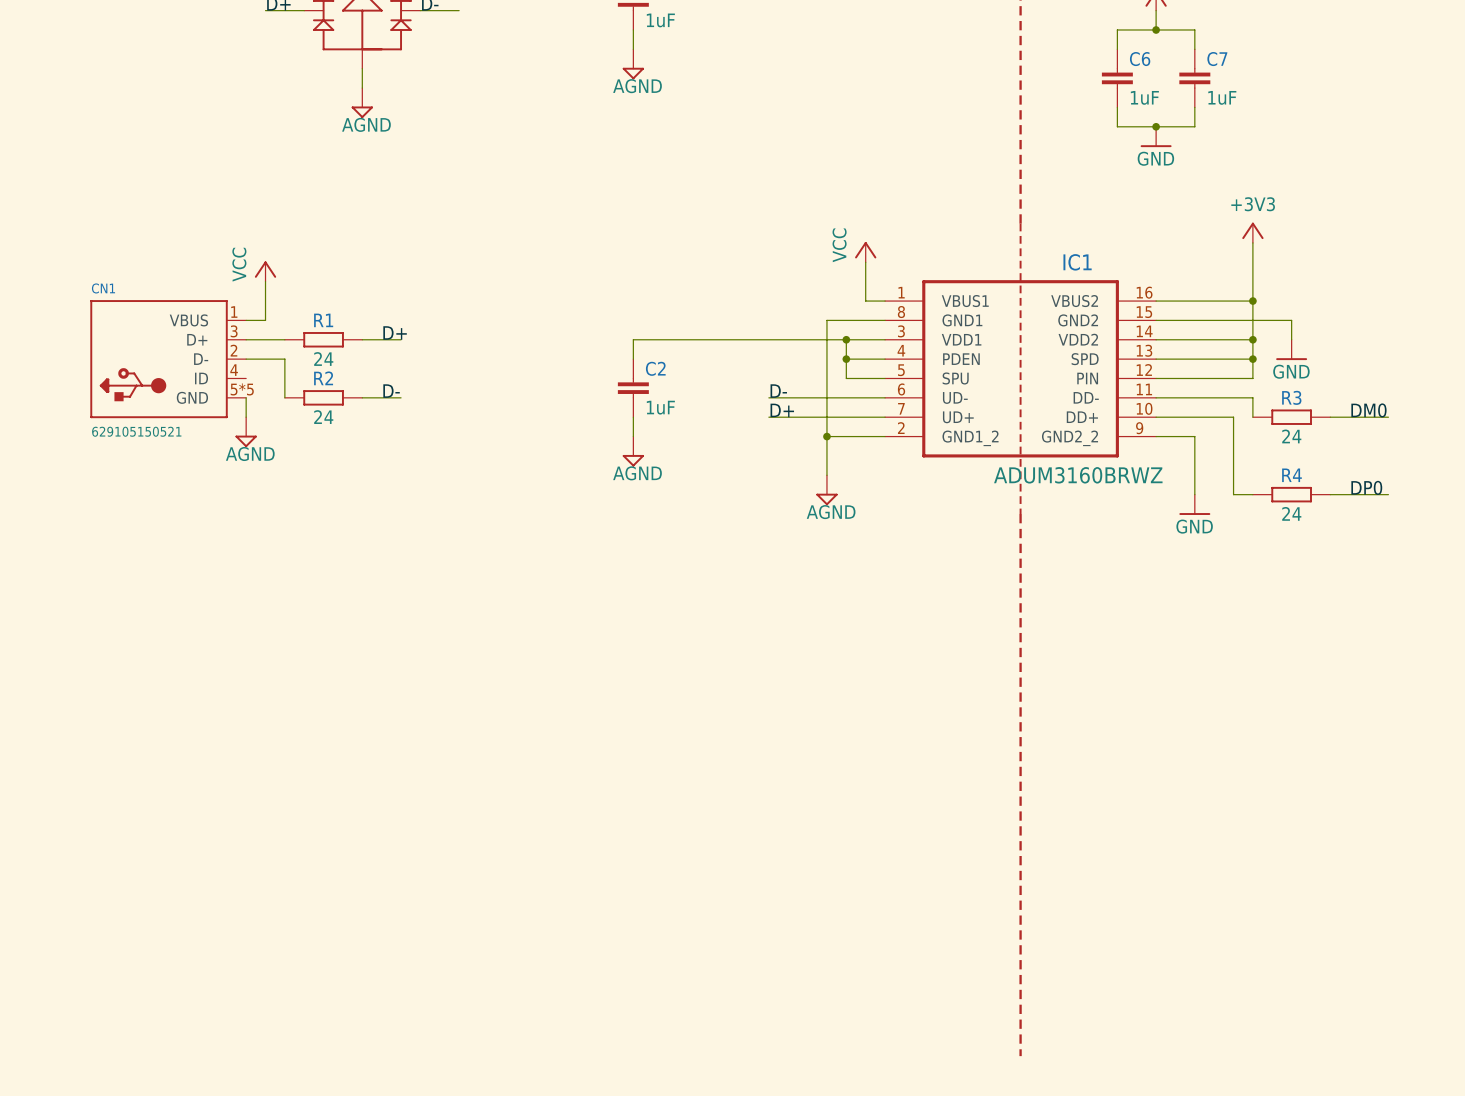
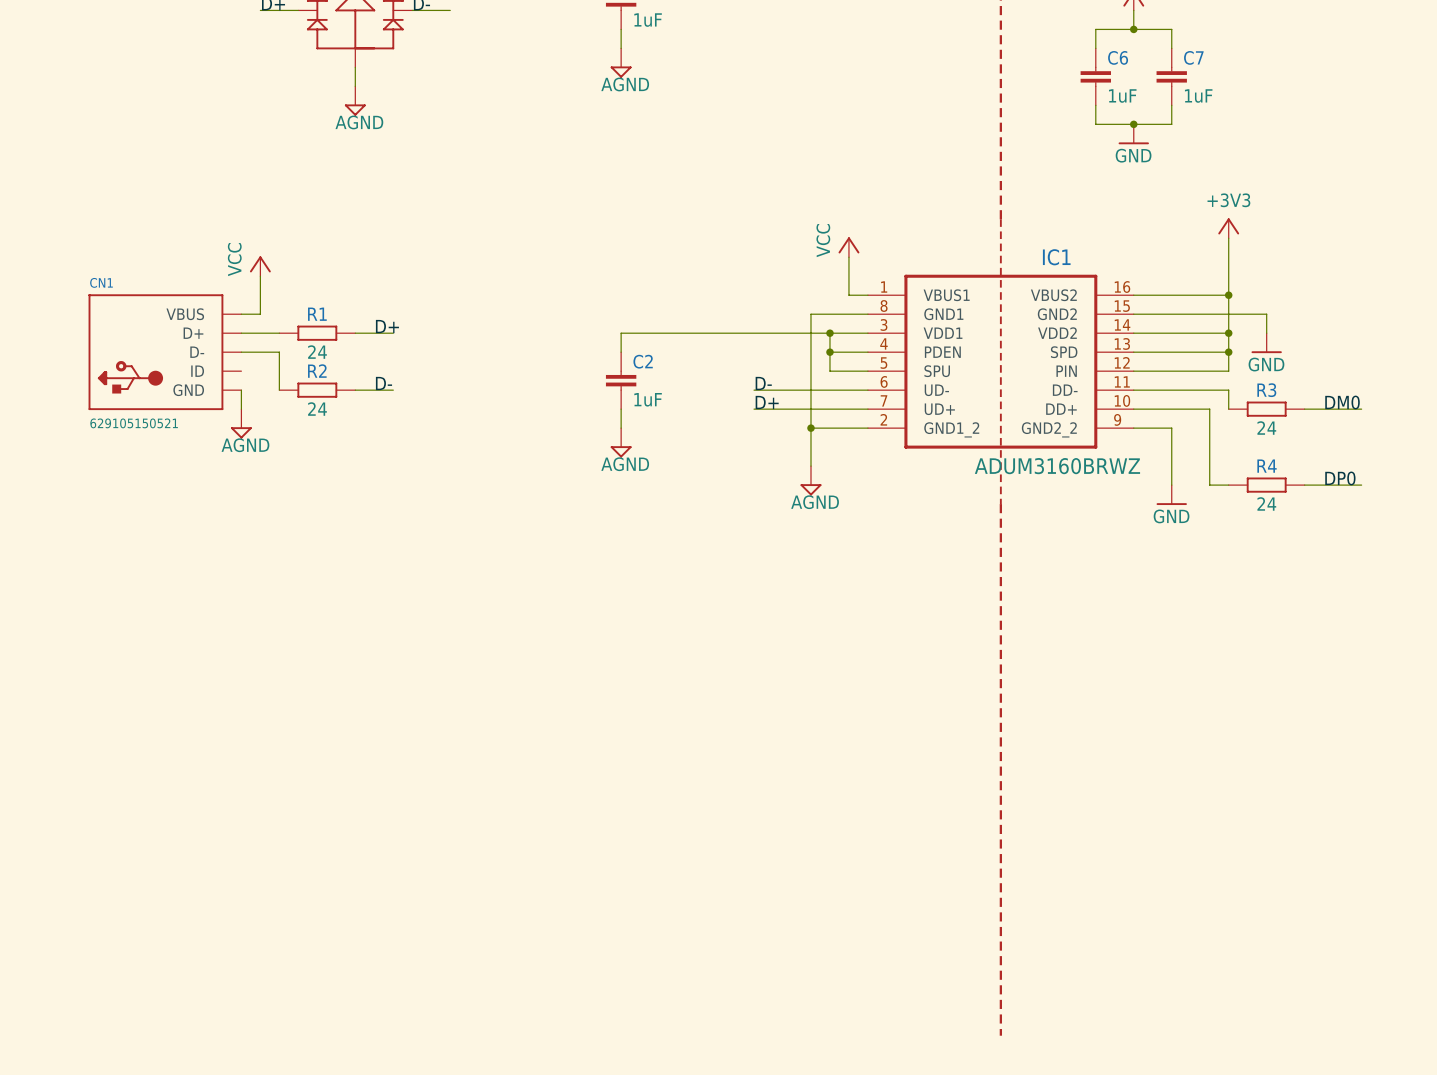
CN1 pin number: 1 (234, 312) -> none
CN1 pin number: 3 (234, 331) -> none
CN1 pin number: 2 (233, 350) -> none
CN1 pin number: 4 (234, 370) -> none
CN1 pin number: 5*5 (242, 389) -> none

